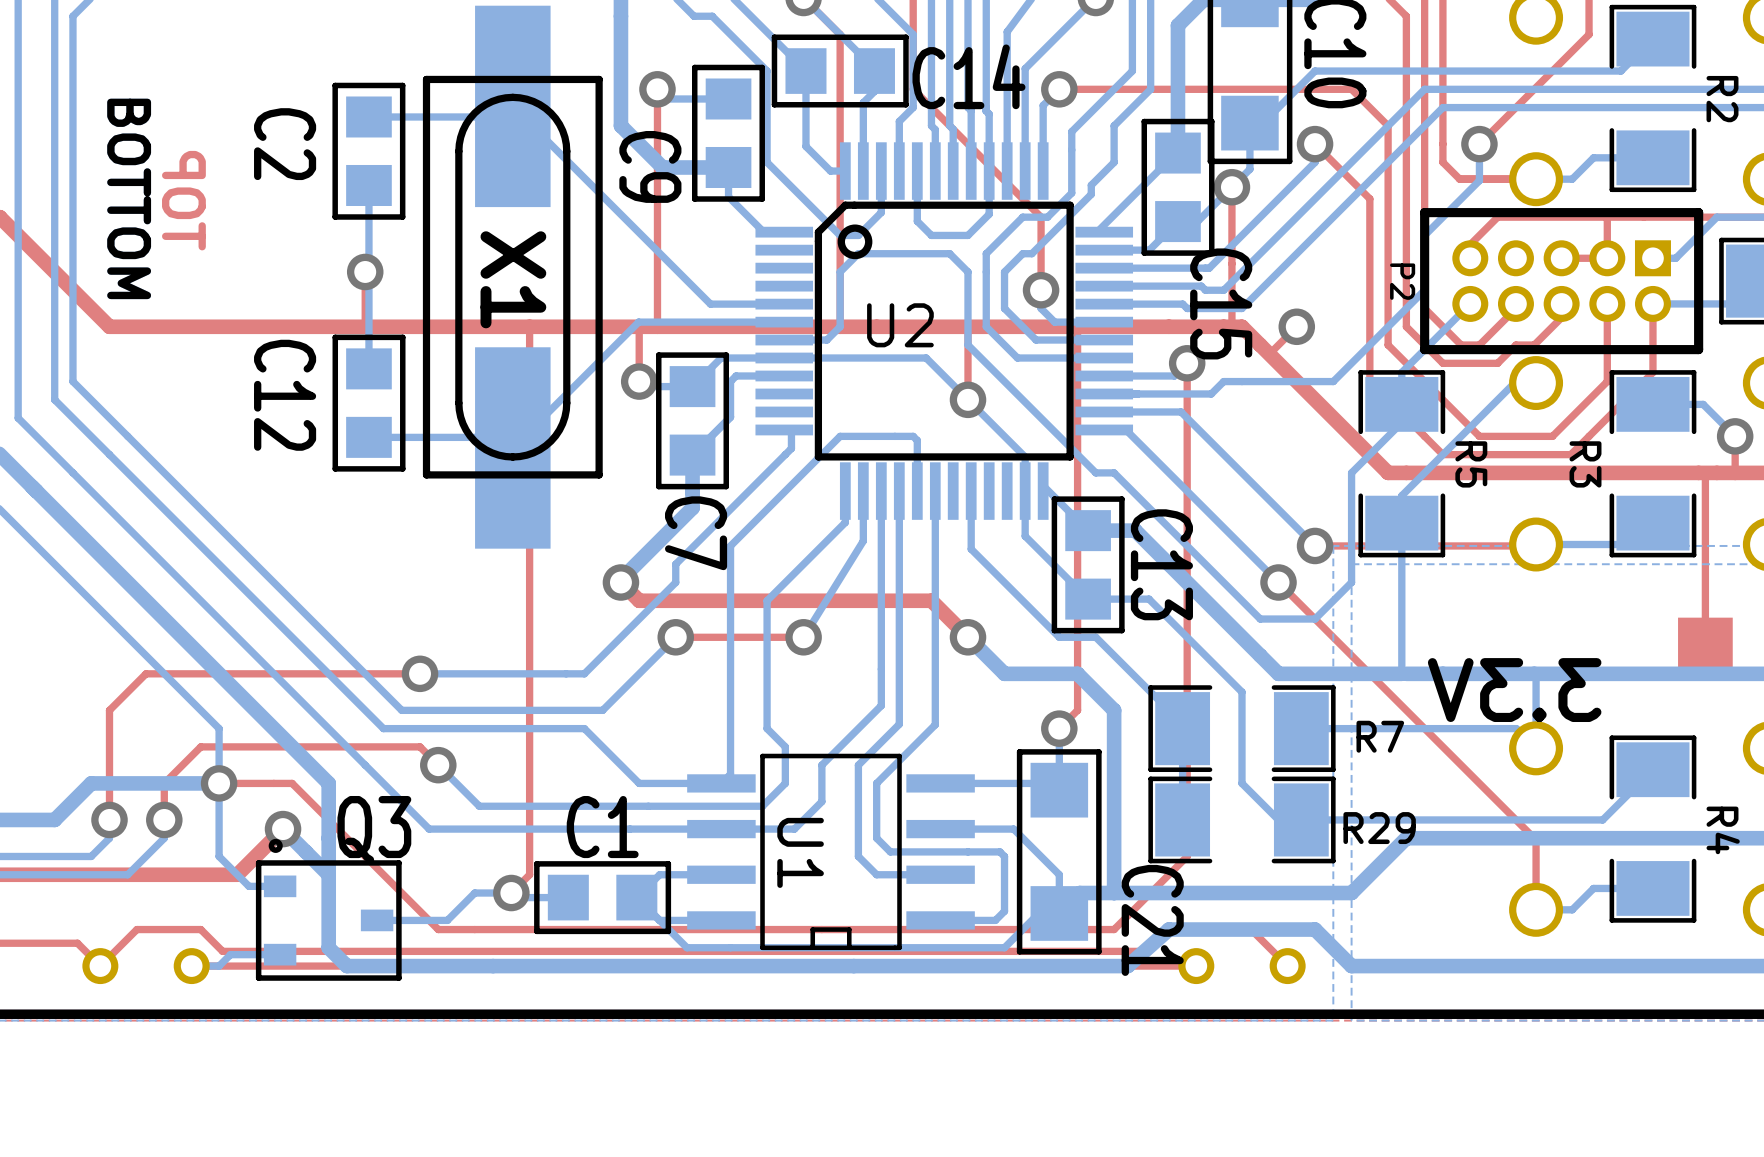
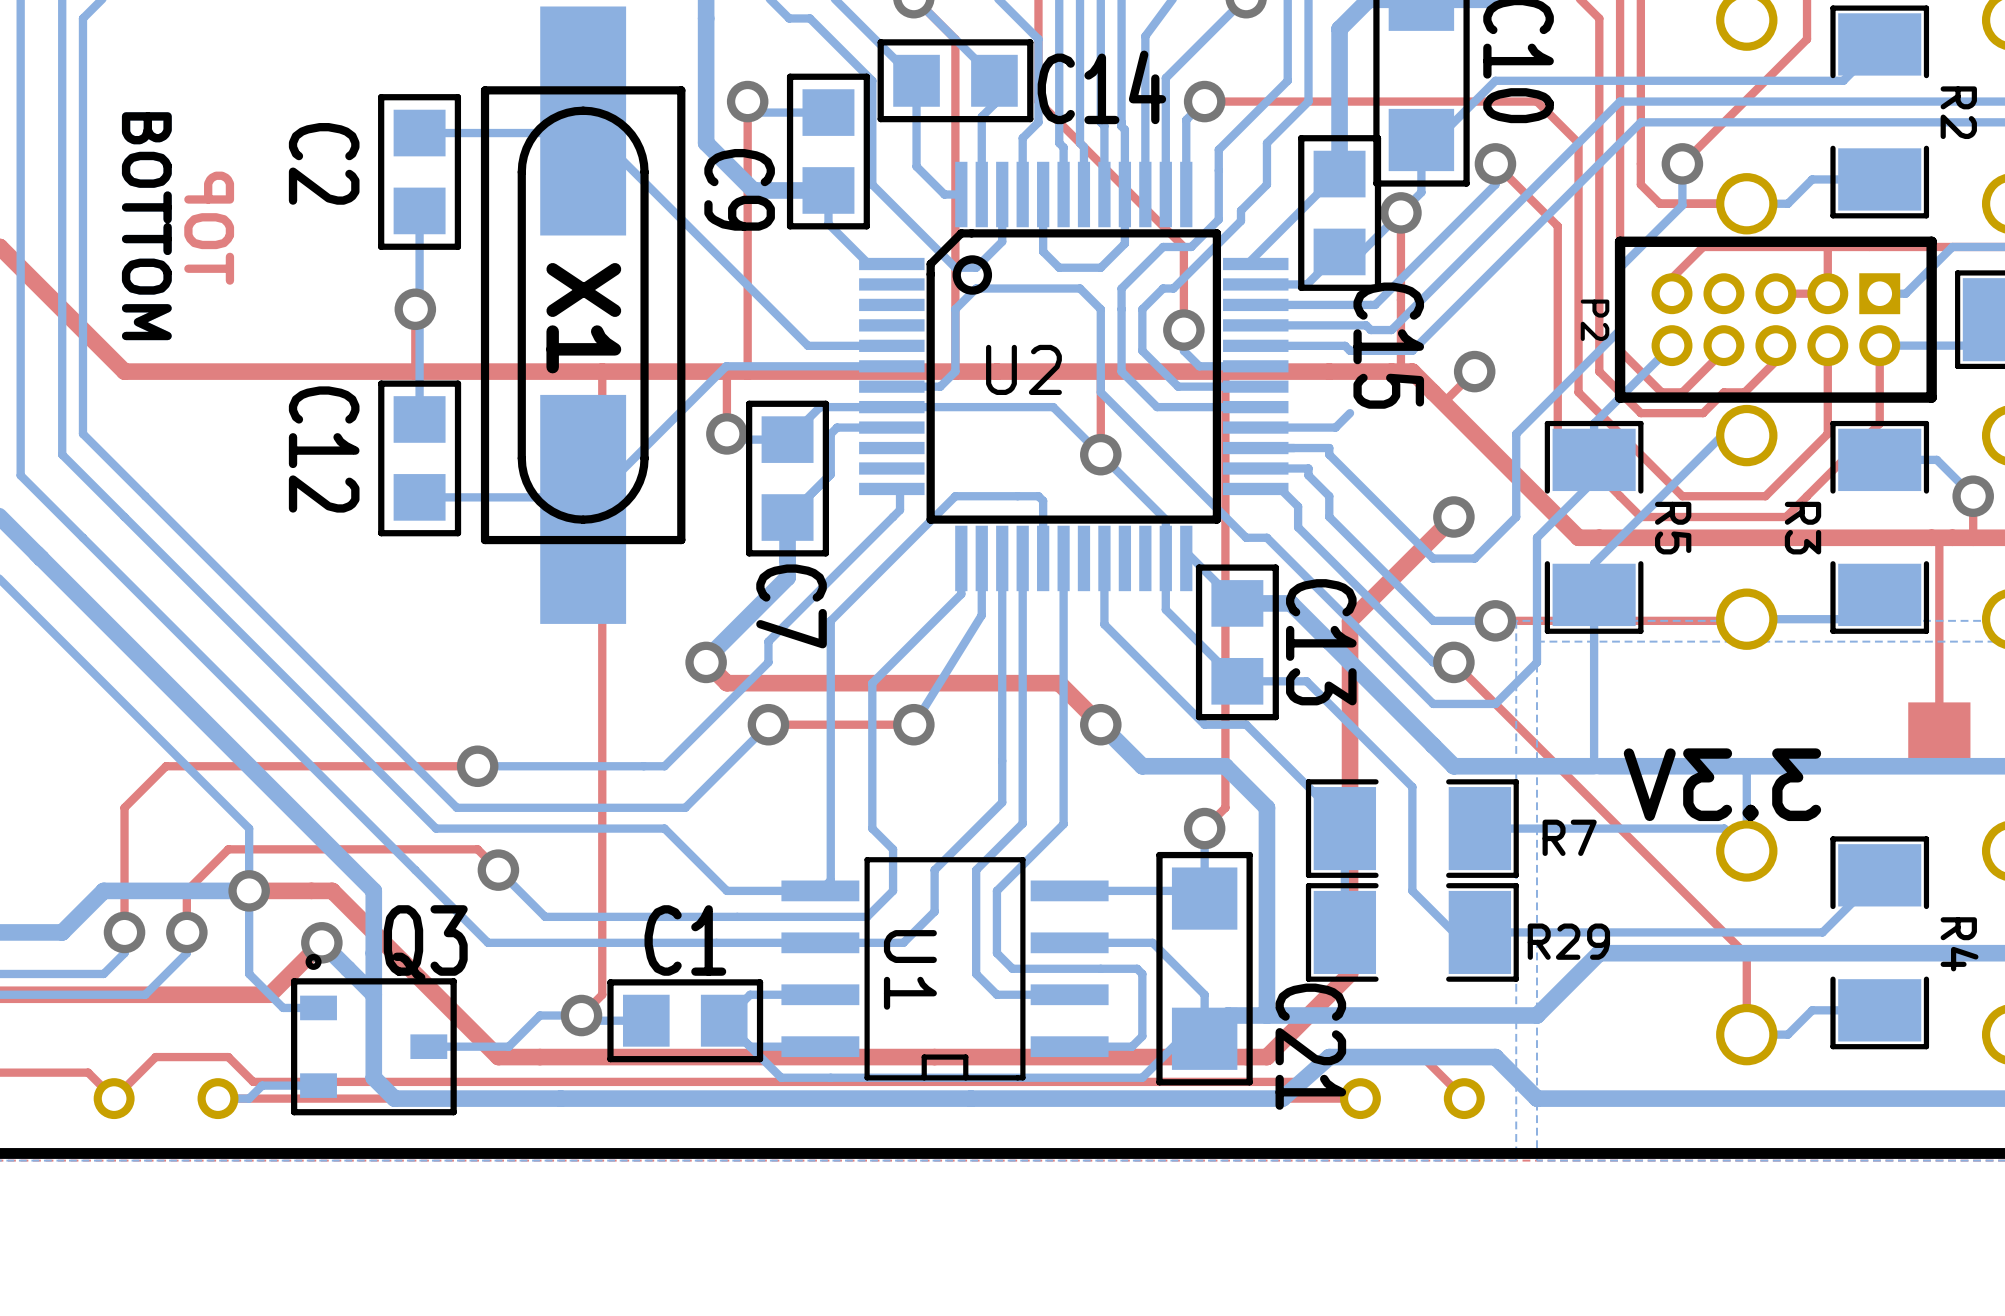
top track: (1187, 363) (1187, 545) -> (1453, 517) (1350, 620)
via position: (1187, 363) -> (1453, 517)
bottom track: (1333, 381) (1223, 381) (1211, 393) (1168, 393) -> (1516, 433) (1516, 517) (1474, 558) (1433, 558)
bottom track: (1181, 411) (1150, 411) -> (1343, 468) (1329, 454) (1329, 448)
bottom track: (1141, 445) (1278, 582) -> (1298, 506) (1298, 527) (1433, 662) (1453, 662)
bottom track: (1260, 491) (1315, 545) -> (1308, 468) (1308, 475) (1329, 496) (1329, 517) (1433, 620) (1495, 620)
top track width: thin (1187, 545) (1187, 856) (1114, 929) (438, 929) (292, 783) (219, 783) -> thick (1350, 620) (1350, 973) (1266, 1057) (498, 1057) (332, 890) (249, 890)

